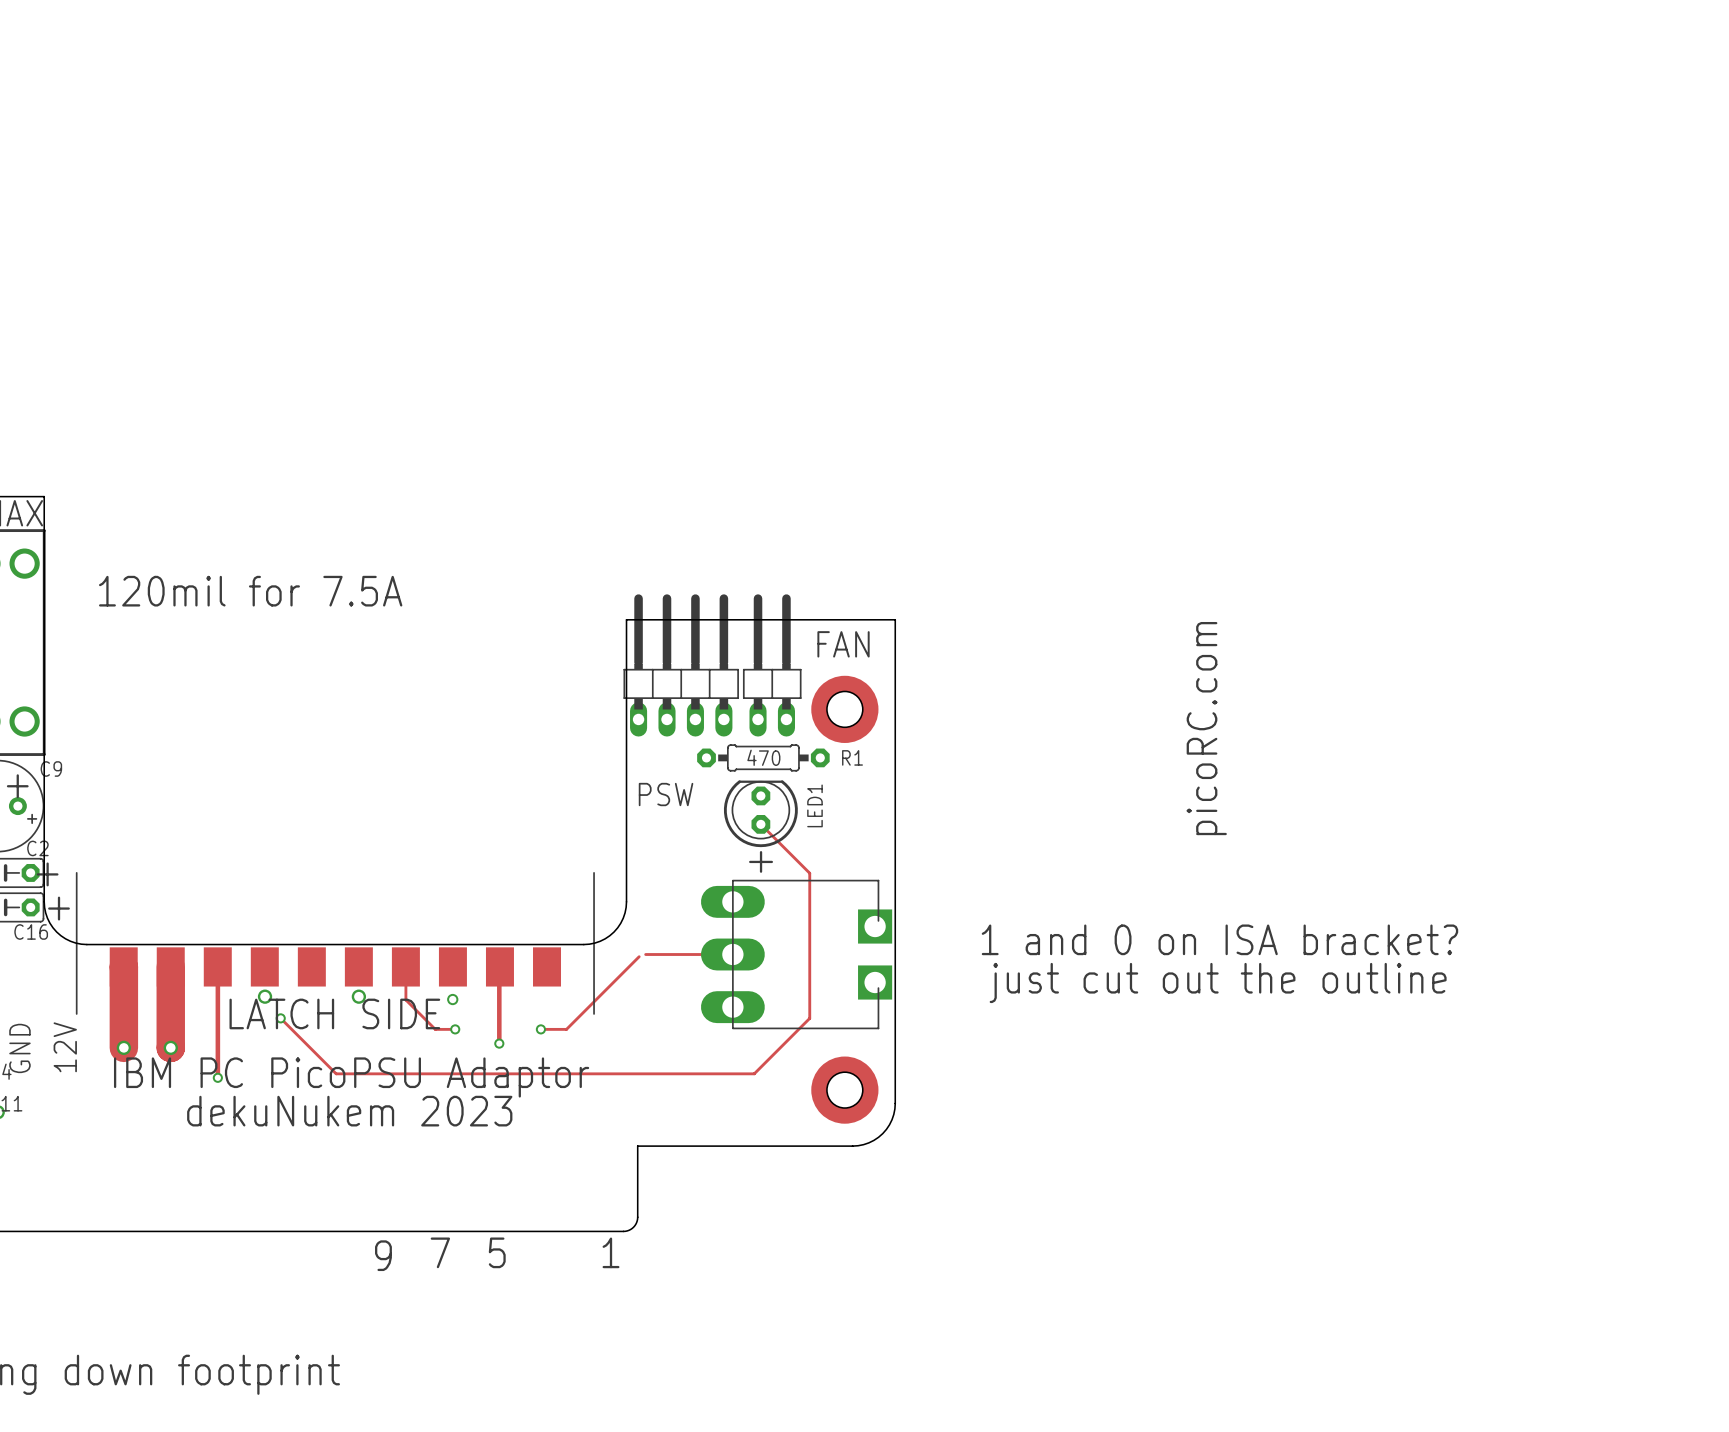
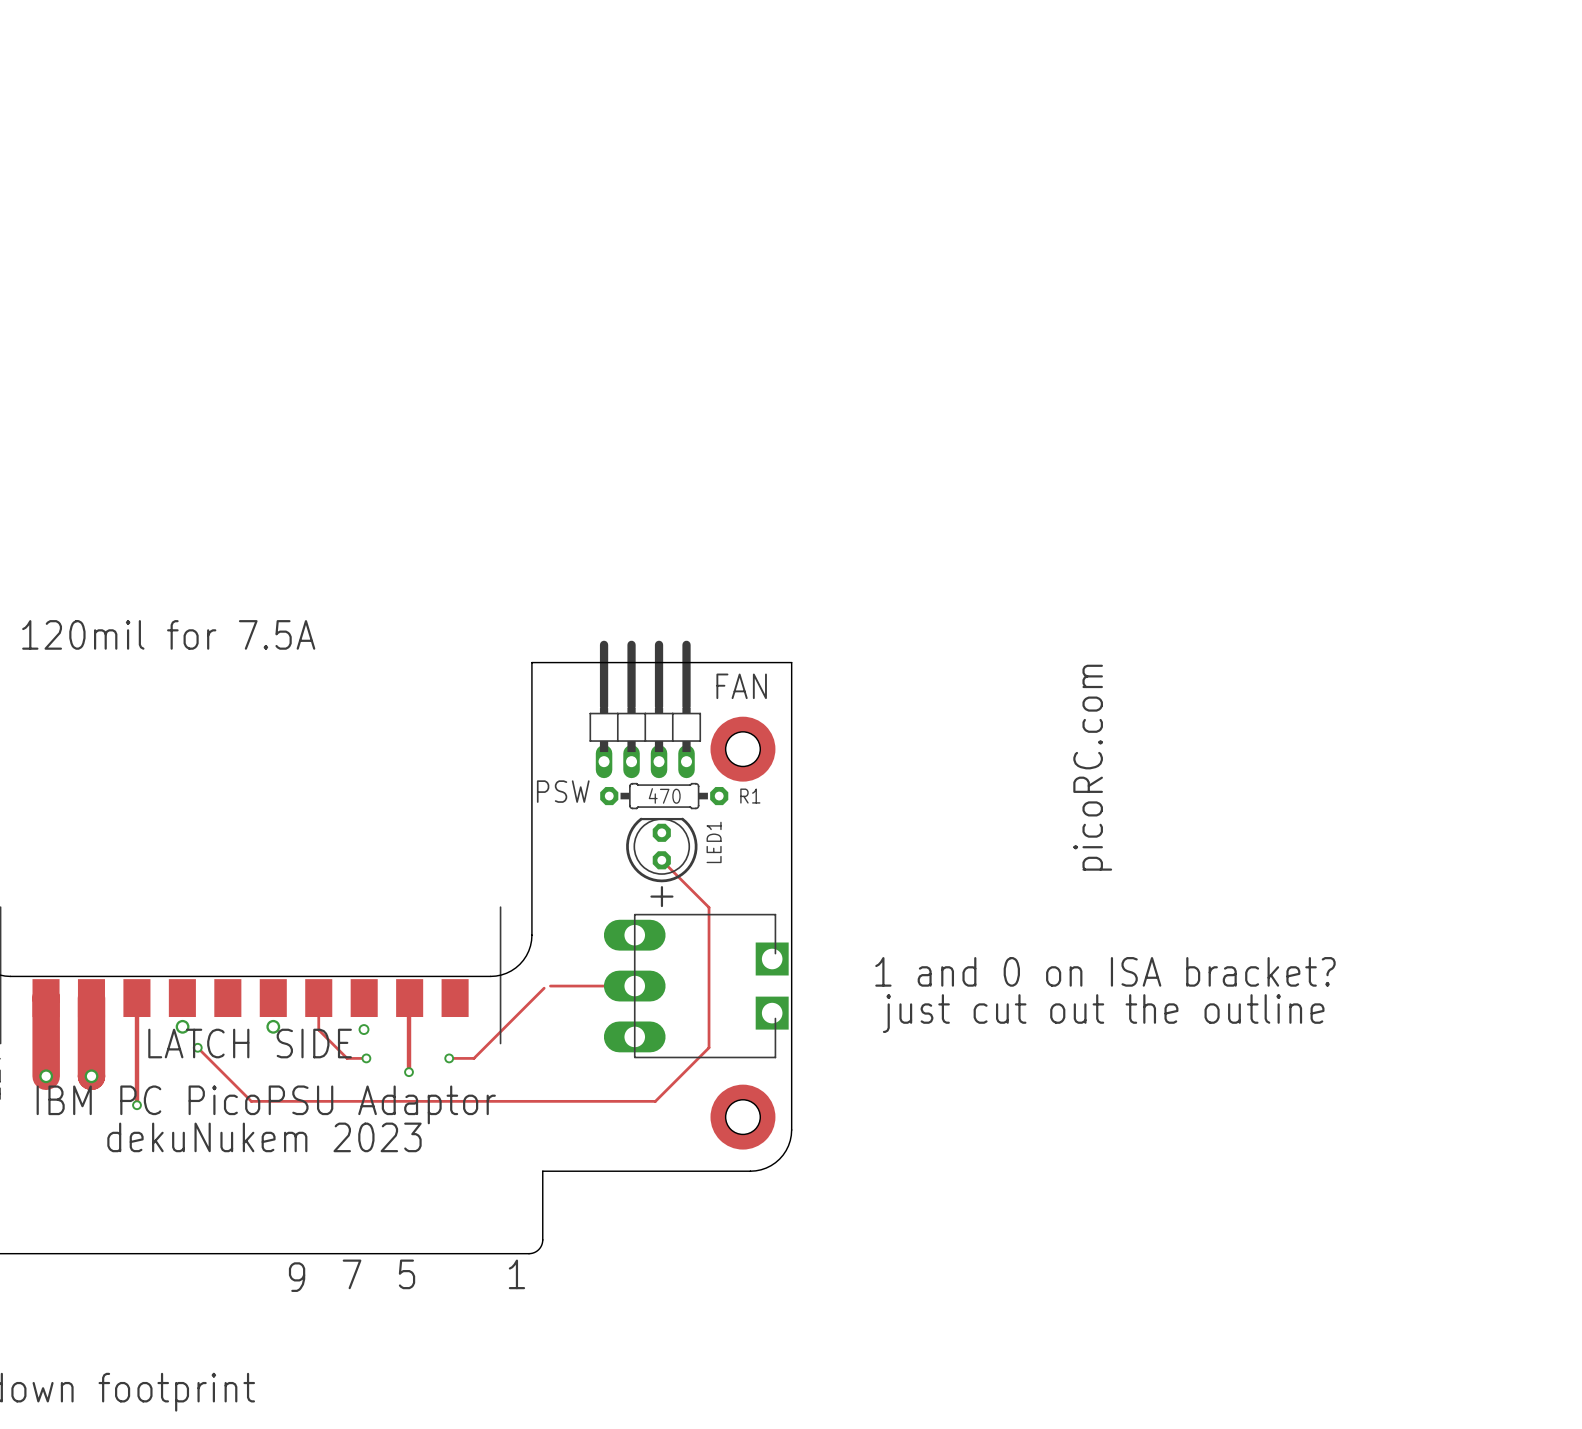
part position: (681, 665) -> (645, 709)
part: (772, 665) -> none
text position: PSW (666, 794) -> PSW (563, 791)

